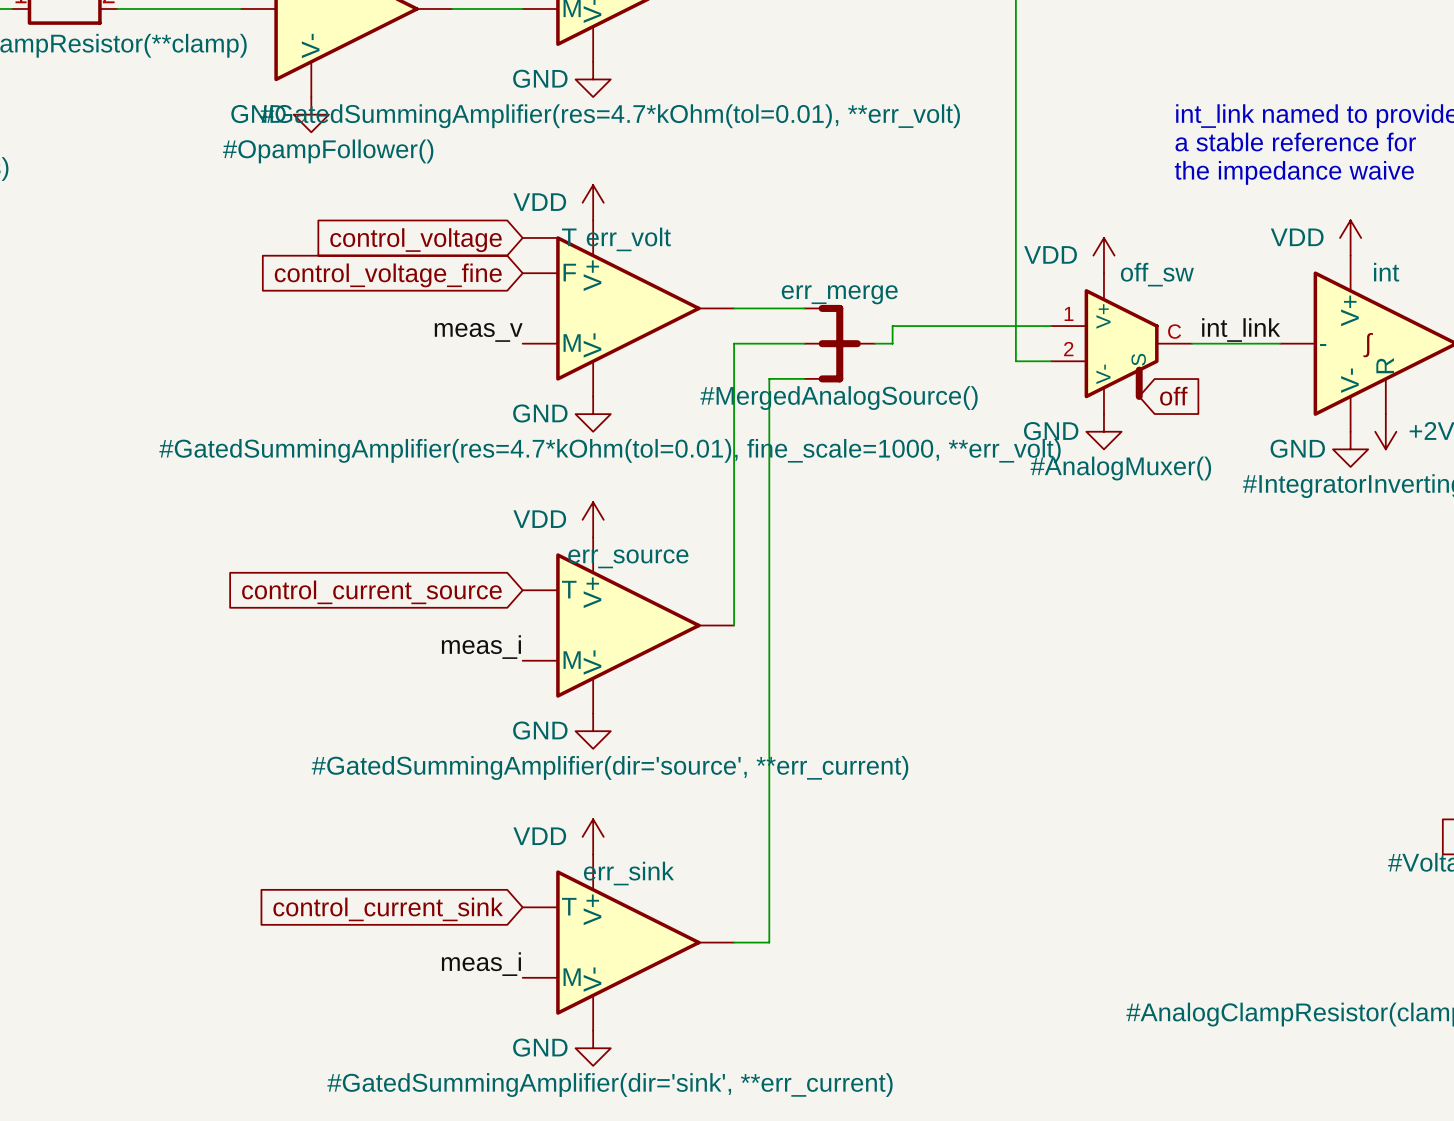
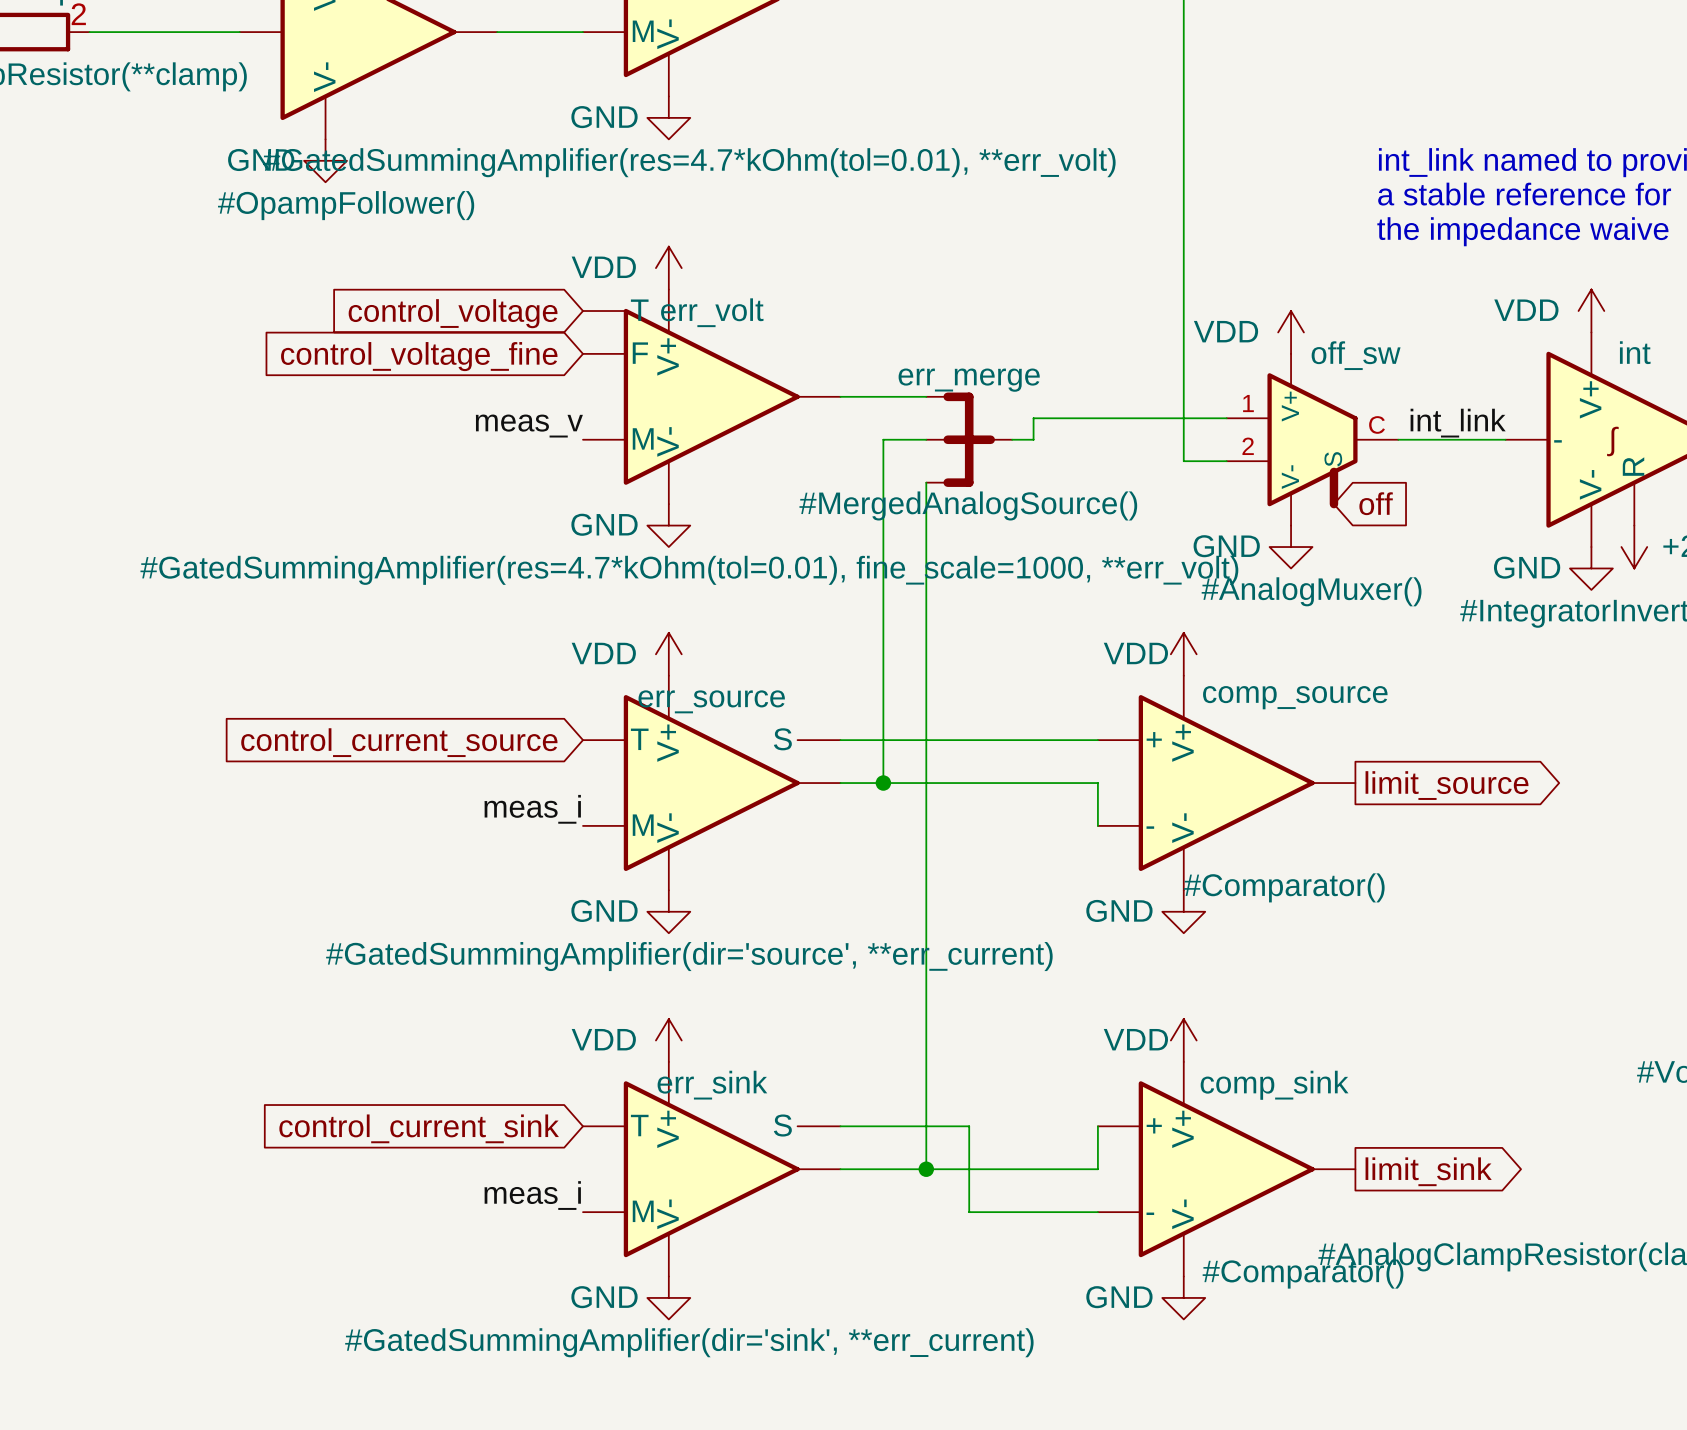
wire: (769, 343) (734, 343) (734, 625) -> (1097, 825) (1097, 783) (840, 783)
wire: (769, 378) (804, 378) -> (883, 482) (883, 439)
wire: none -> (926, 482) (926, 1169)
power symbol: none -> VDD (1183, 654)
err_source symbol: [522, 537, 735, 714] -> [583, 675, 841, 891]
wire: none -> (840, 740) (1097, 740)
wire: (769, 625) (769, 942) -> (1097, 1126) (1097, 1169) (883, 1169)
junction: none -> (883, 783)
comp_source: none -> #Comparator() (1226, 783)
global label: none -> limit_source (1447, 785)
power symbol: none -> GND (1183, 911)
power symbol: none -> VDD (1183, 1040)
err_sink symbol: [522, 854, 735, 1031] -> [583, 1061, 841, 1277]
wire: none -> (840, 1126) (969, 1126) (969, 1212) (1097, 1212)
junction: none -> (926, 1169)
comp_sink: none -> #Comparator() (1226, 1169)
global label: none -> limit_sink (1428, 1171)
power symbol: none -> GND (1183, 1297)

